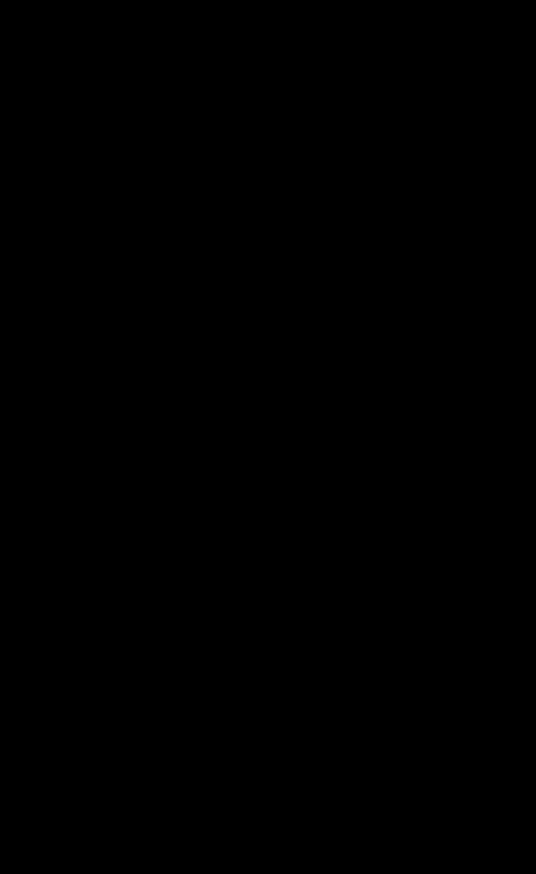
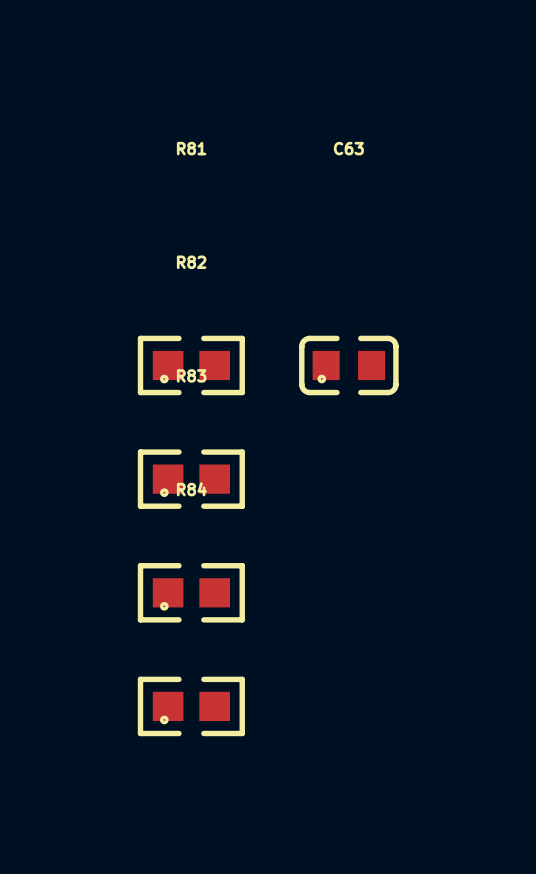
R81: none -> (191, 365)
C63: none -> (348, 365)
R82: none -> (191, 479)
R83: none -> (191, 592)
R84: none -> (191, 706)

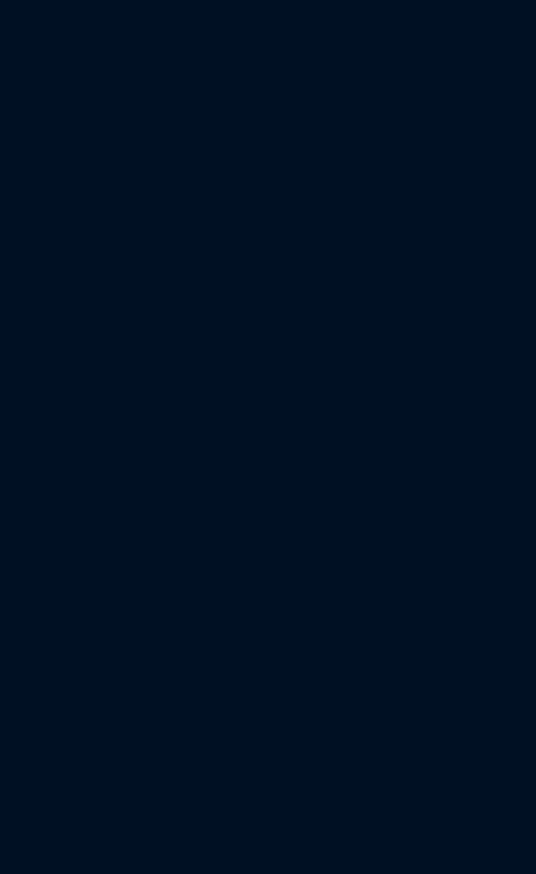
R81: (191, 365) -> none
C63: (348, 365) -> none
R82: (191, 479) -> none
R83: (191, 592) -> none
R84: (191, 706) -> none

